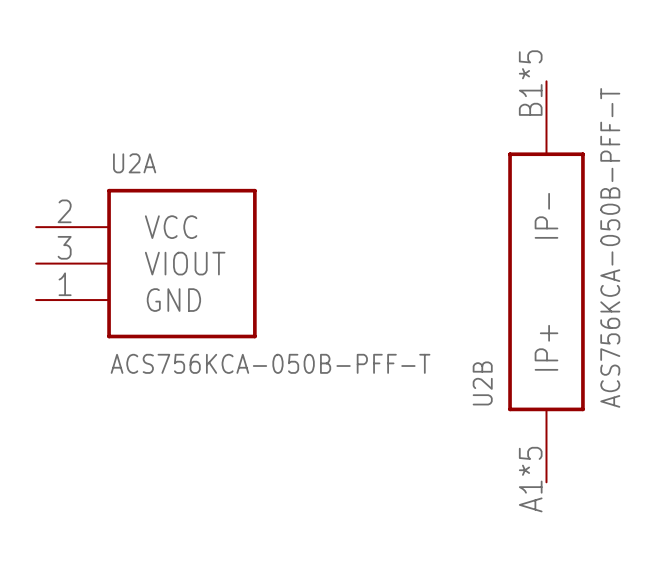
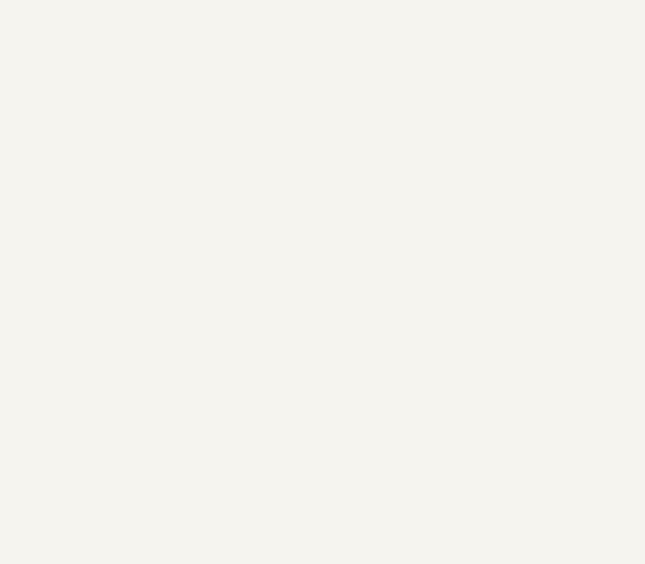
U2A: ACS756KCA-050B-PFF-T (146, 263) -> none
U2B: ACS756KCA-050B-PFF-T (546, 281) -> none

